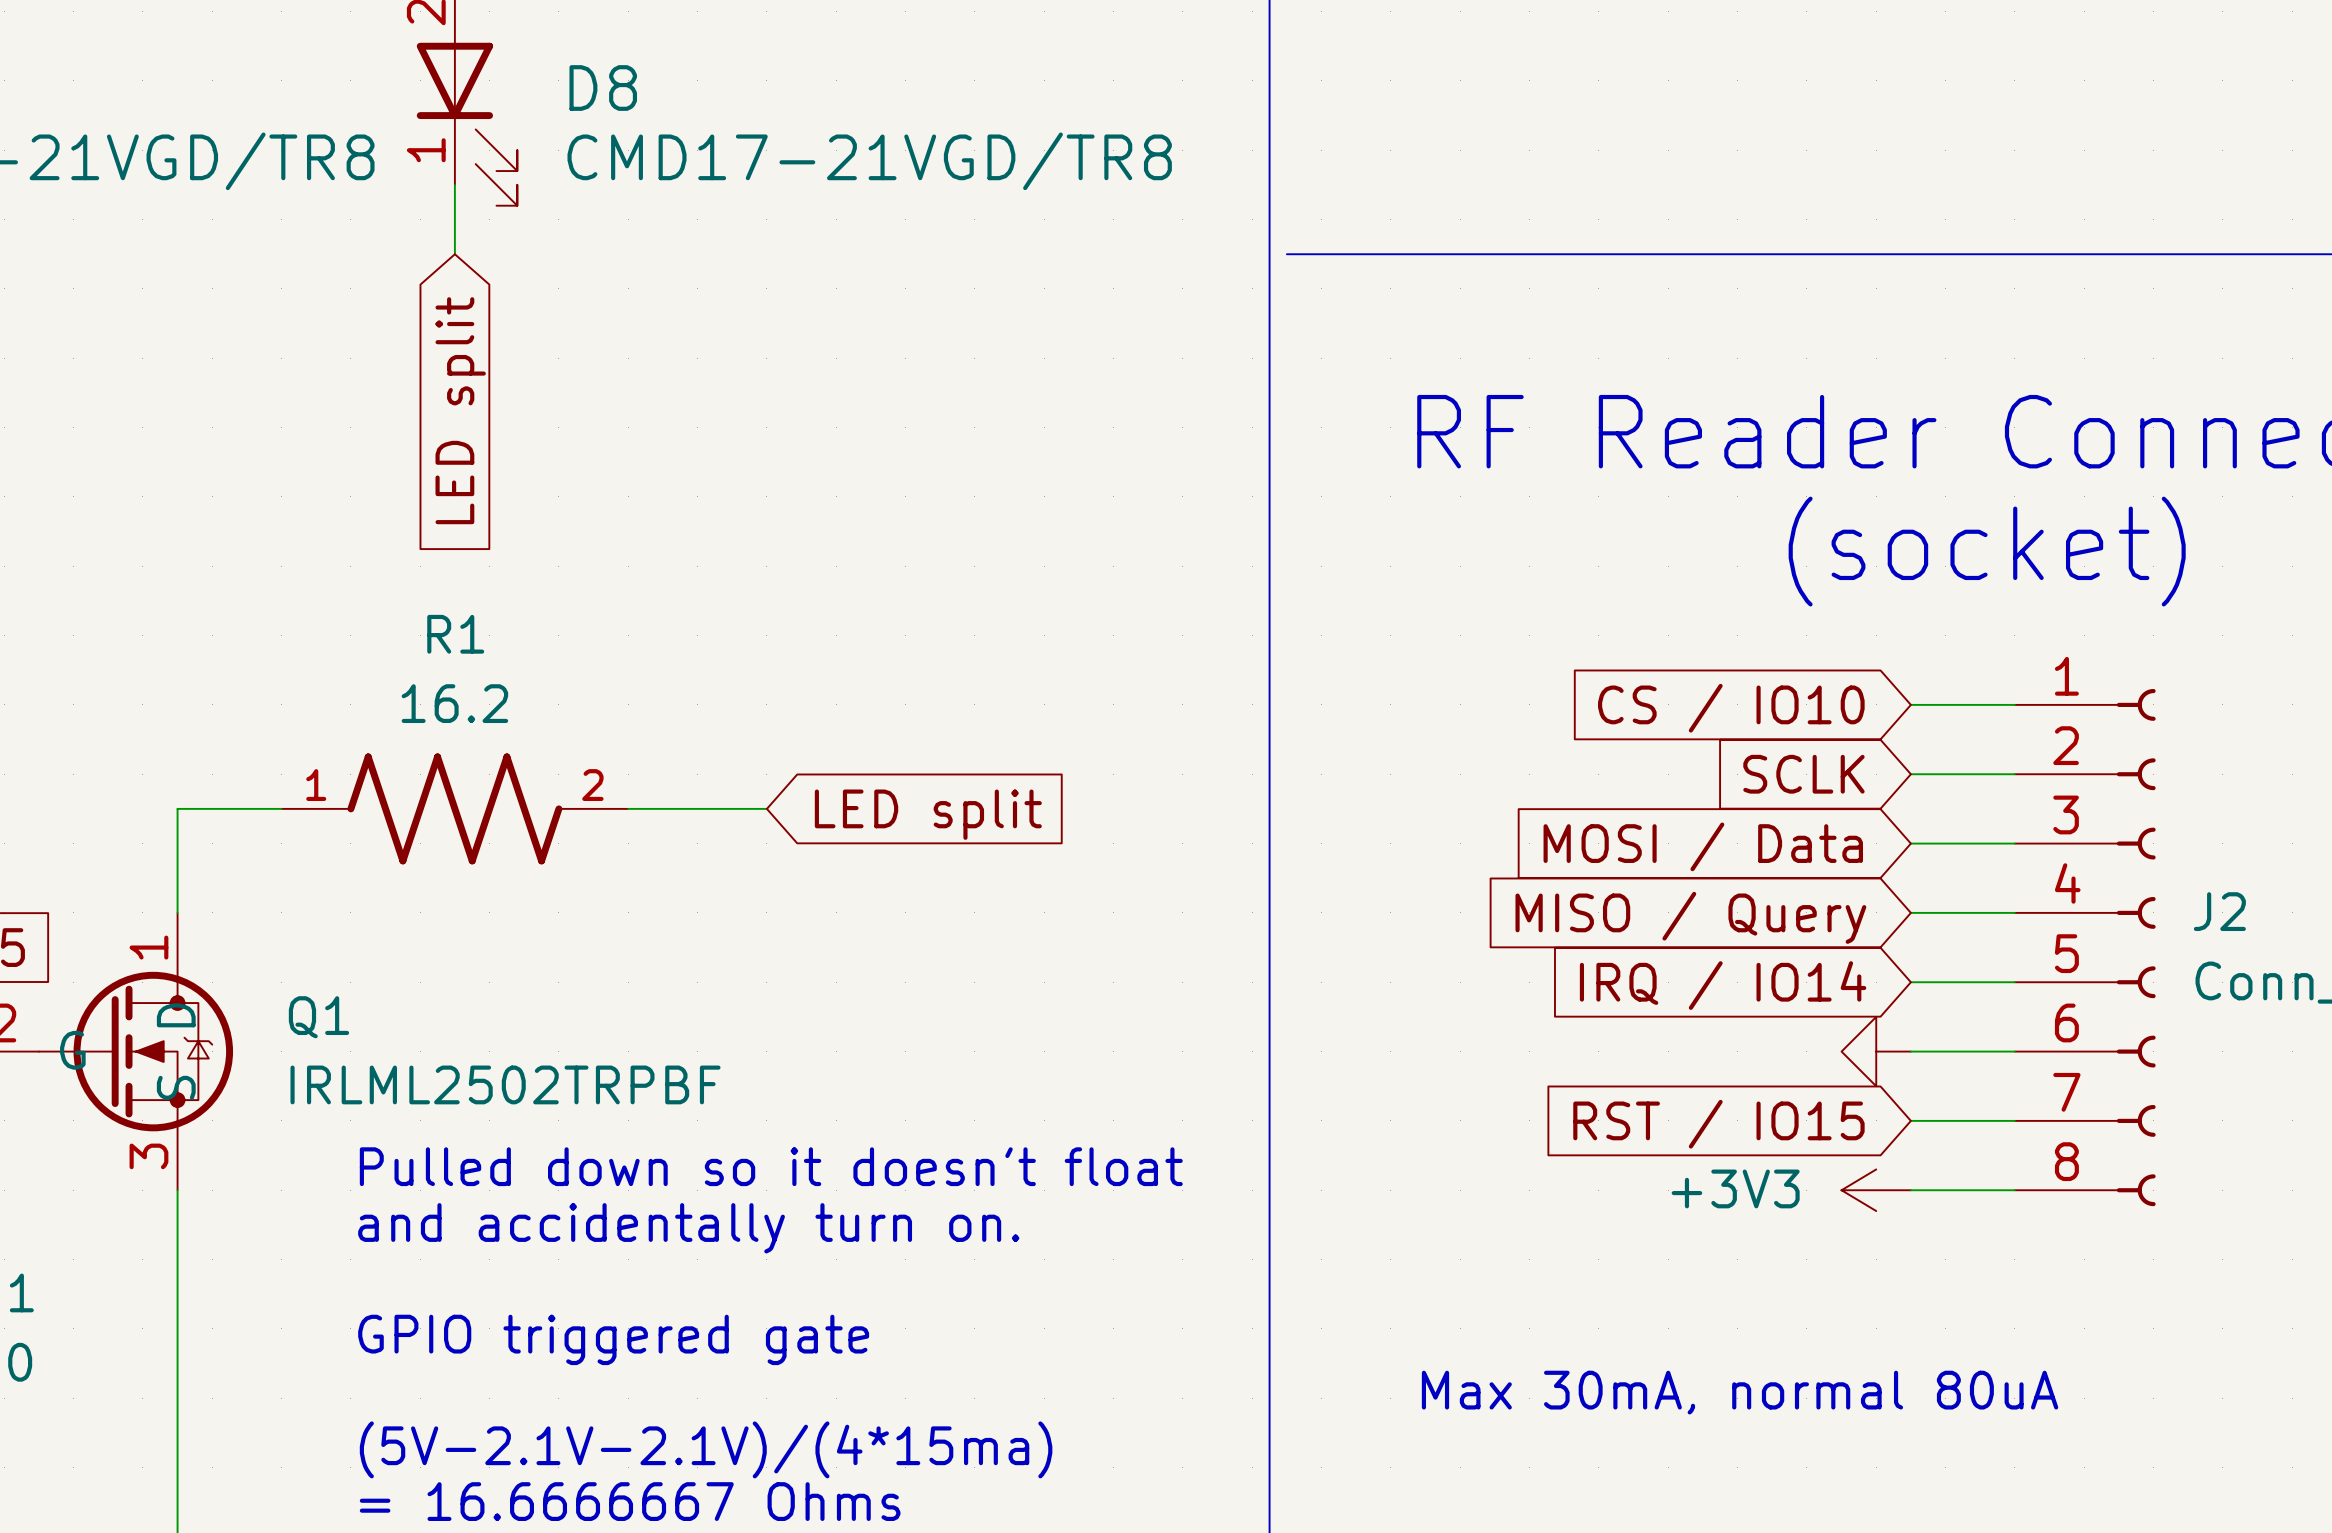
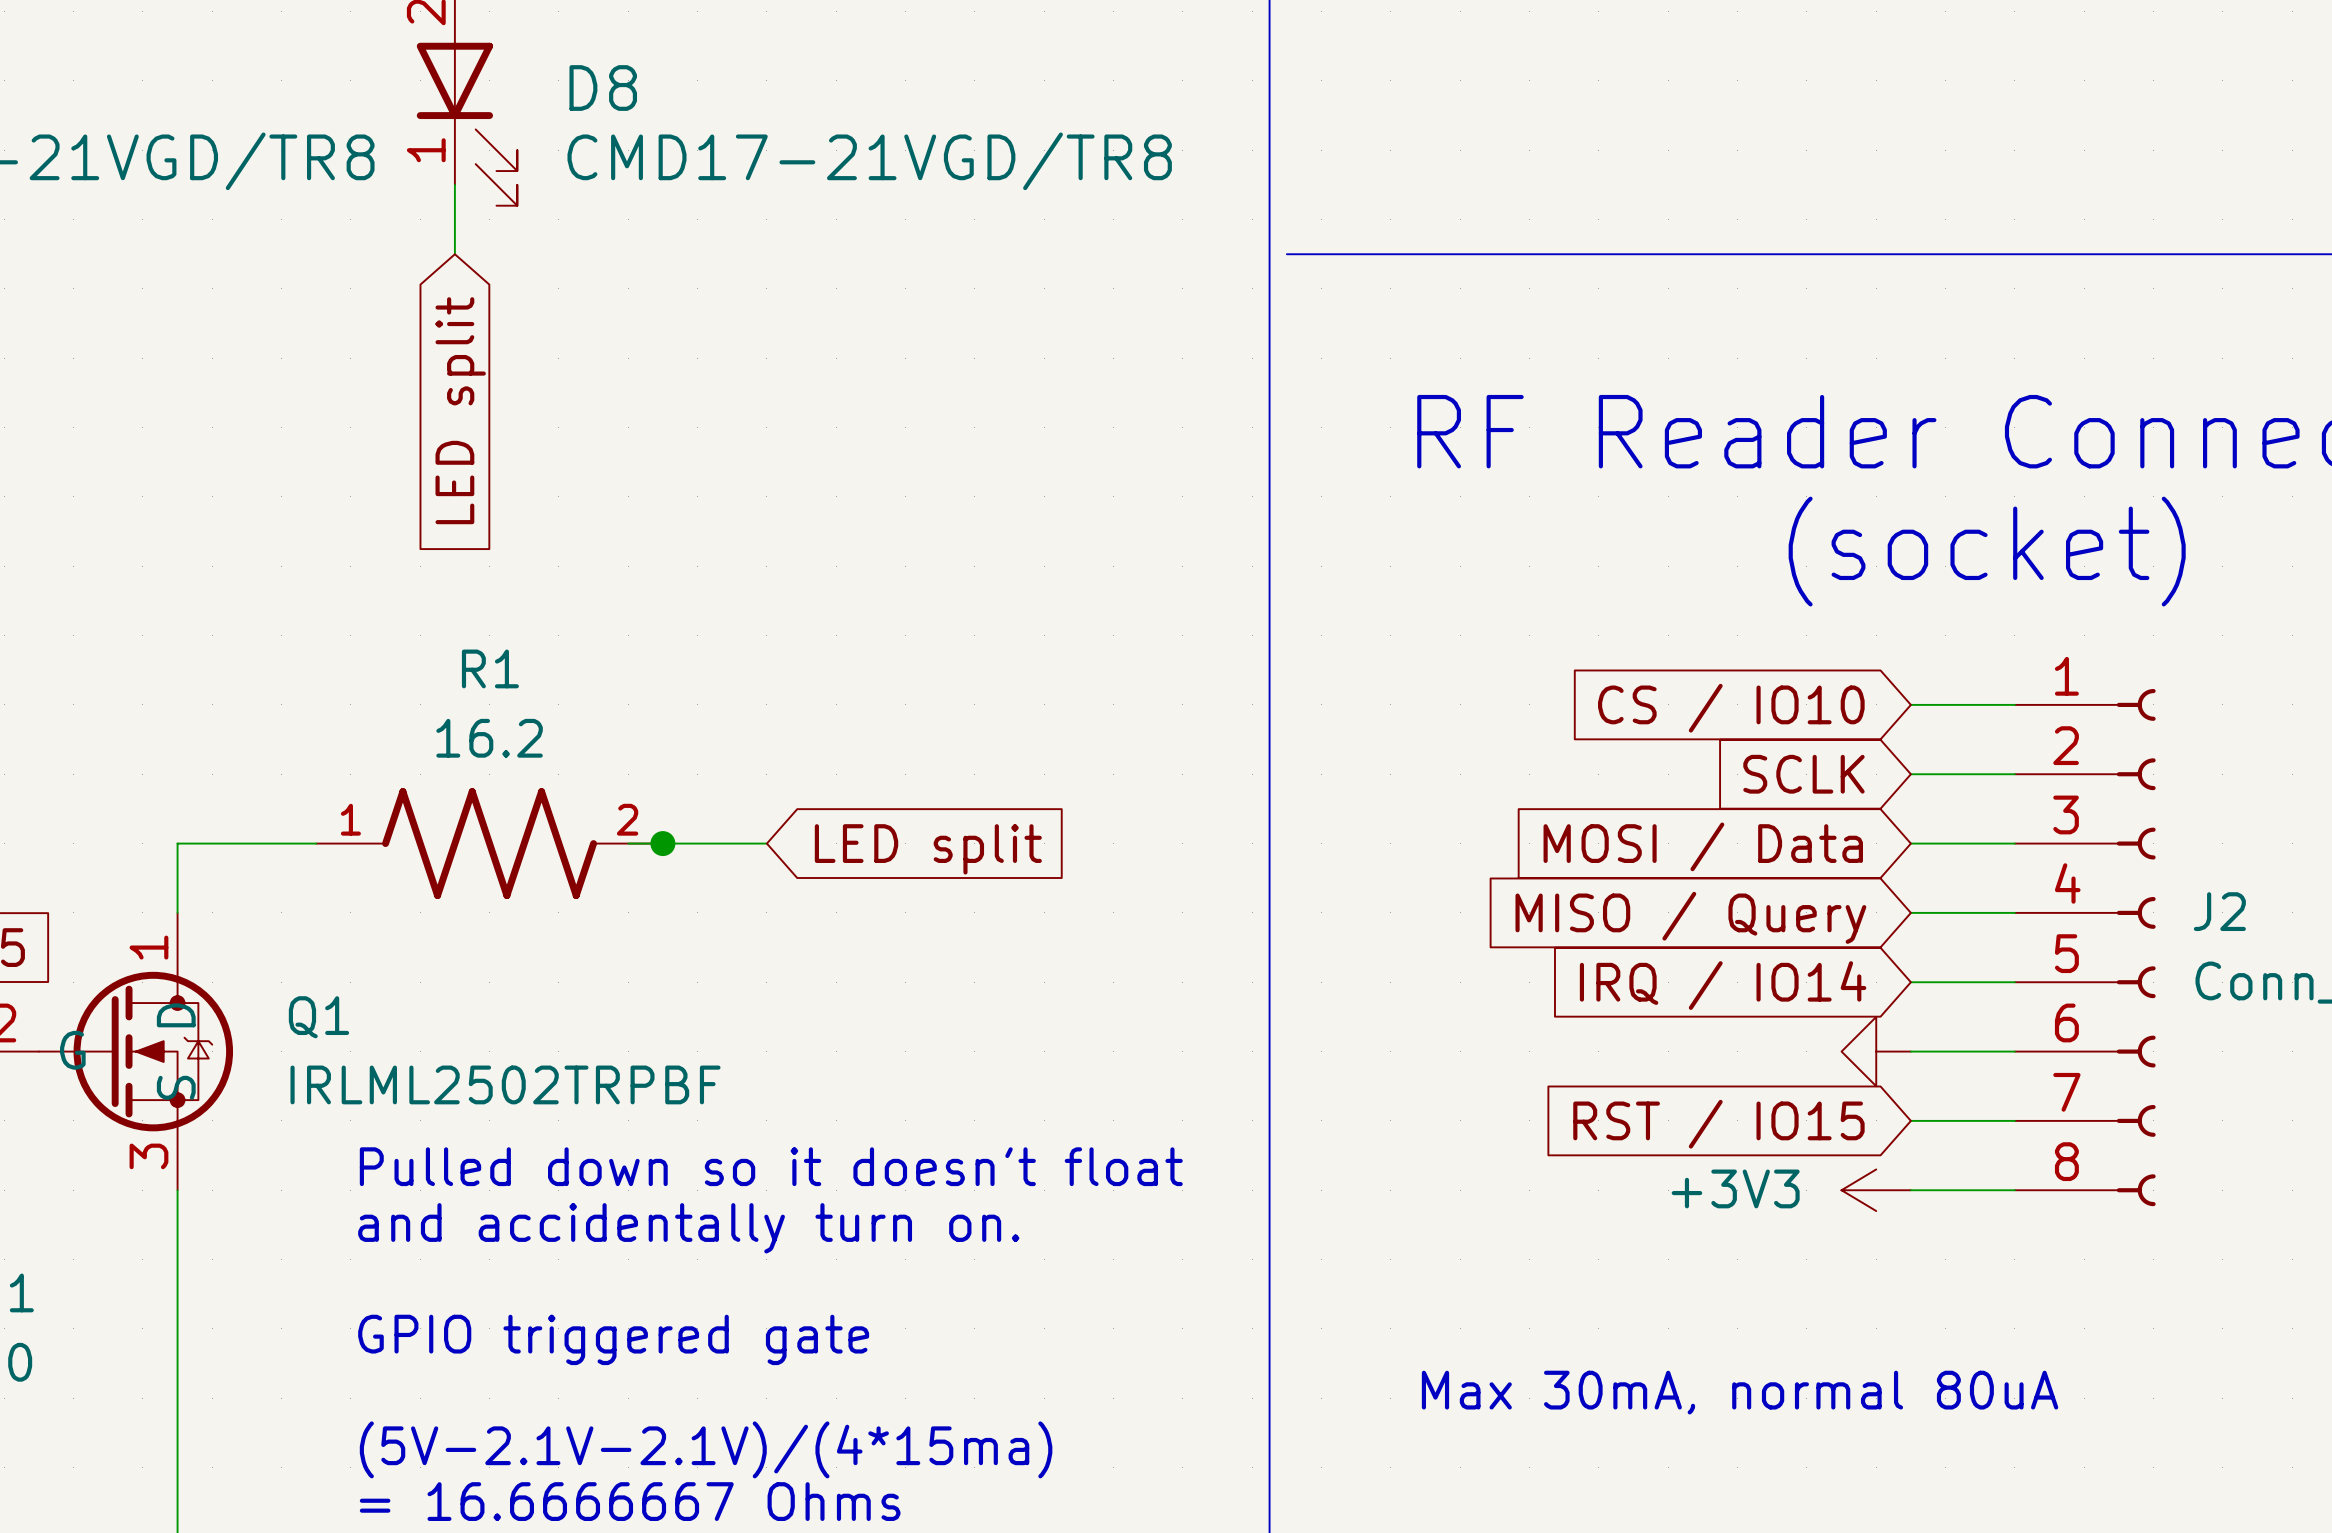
wire: (281, 808) (177, 808) (177, 843) -> (316, 843) (177, 843)
R1 position: (454, 808) -> (489, 843)
wire: (628, 808) (766, 808) -> (628, 843) (766, 843)
global label position: LED split (928, 814) -> LED split (928, 849)
junction: none -> (662, 843)

